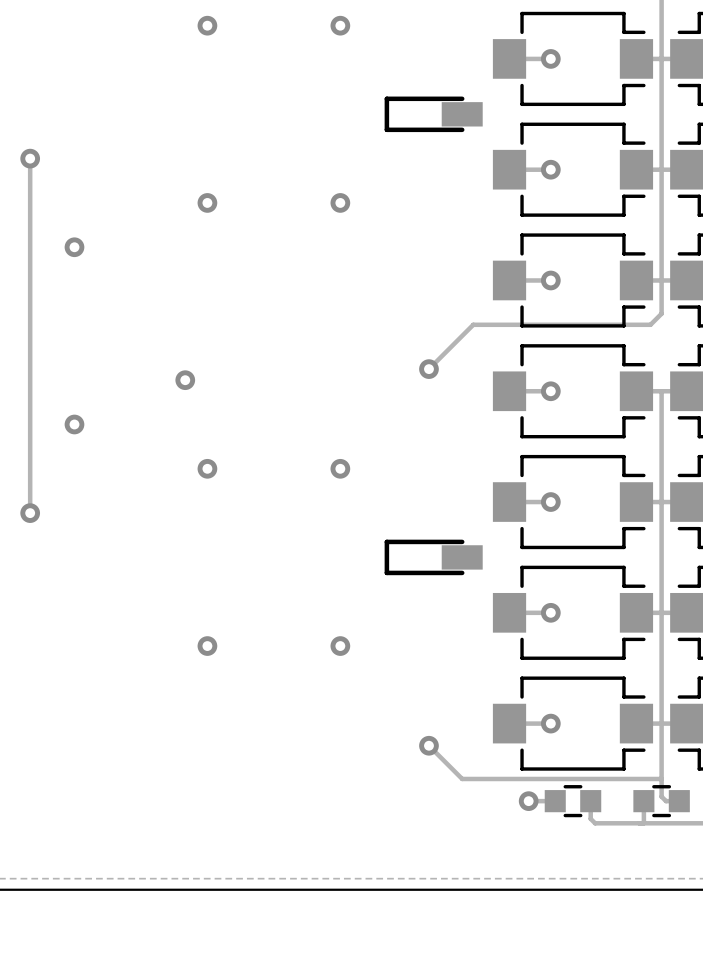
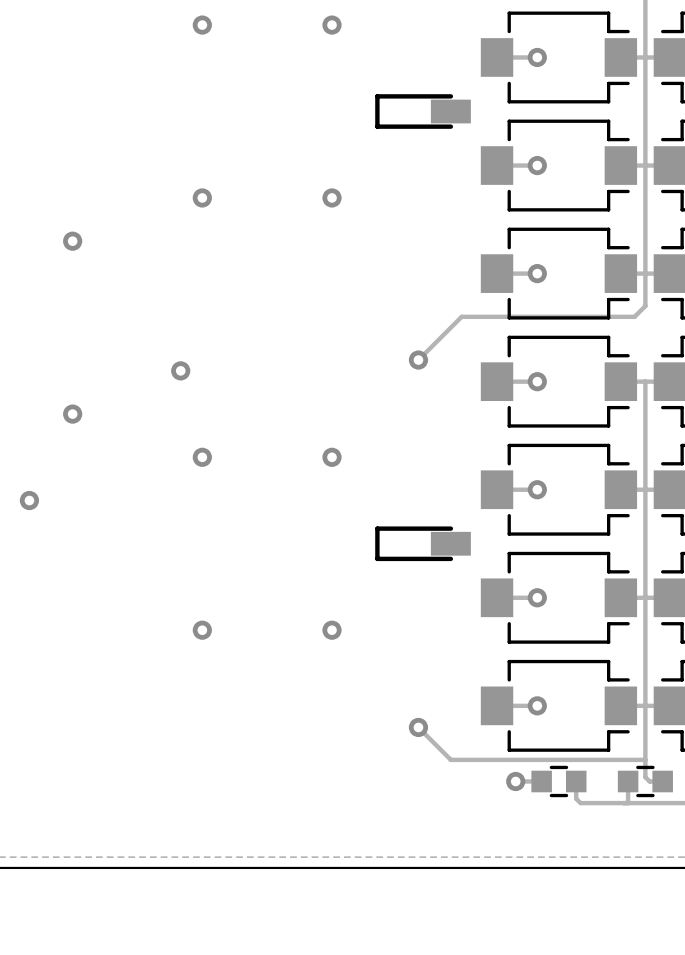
track: (30, 158) (30, 513) -> none
via: (30, 158) -> none

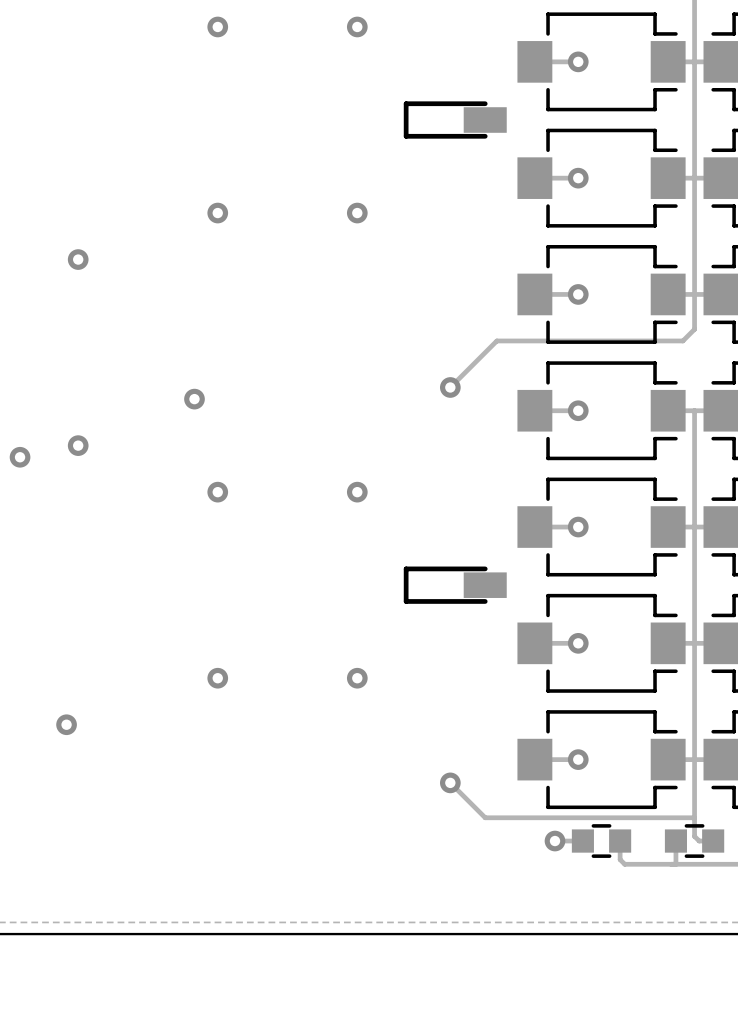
via position: (29, 500) -> (20, 457)
via: none -> (66, 724)

